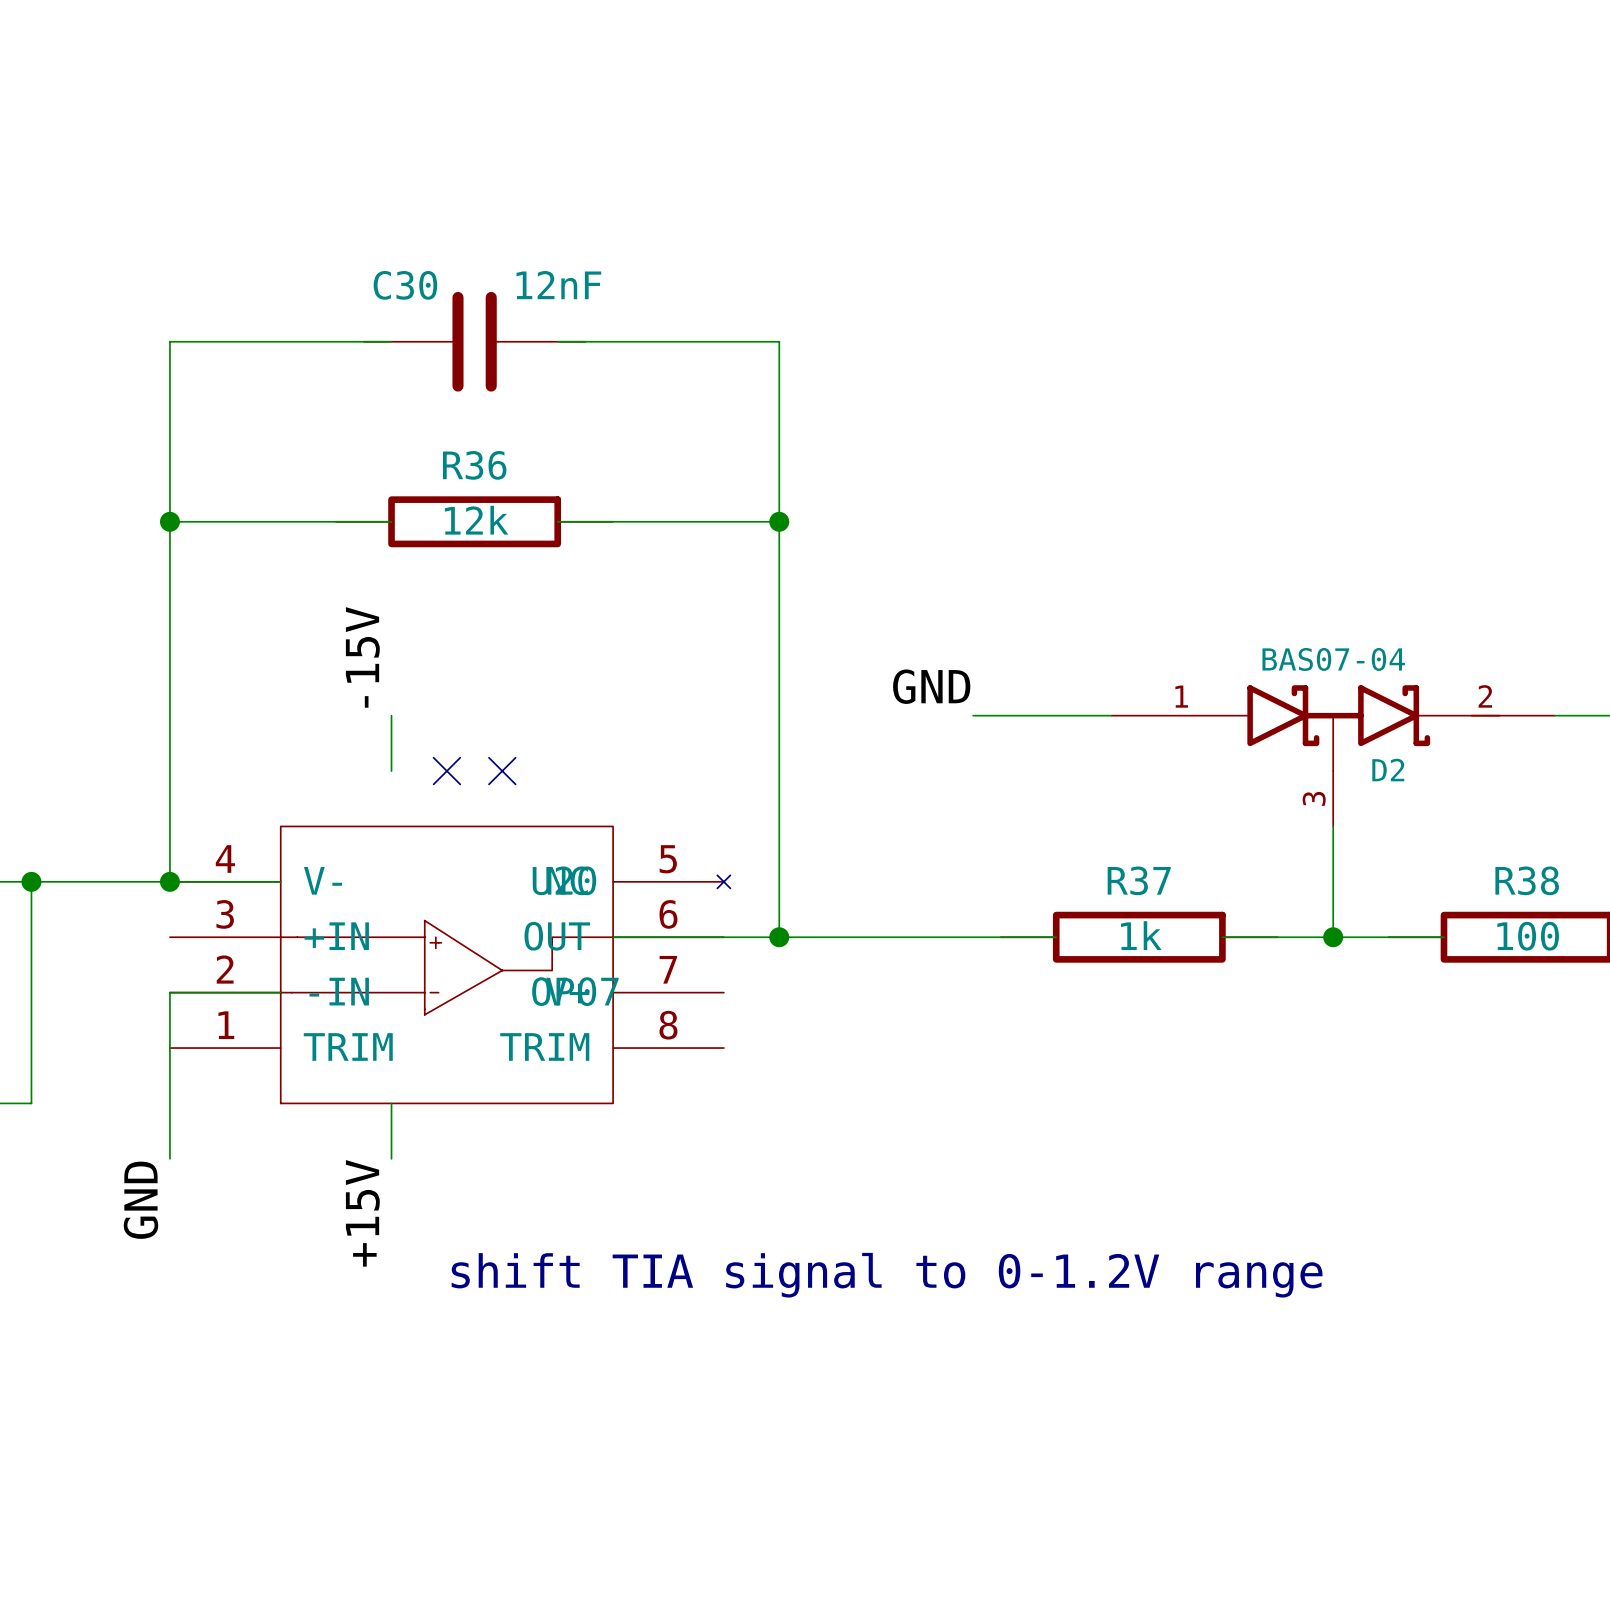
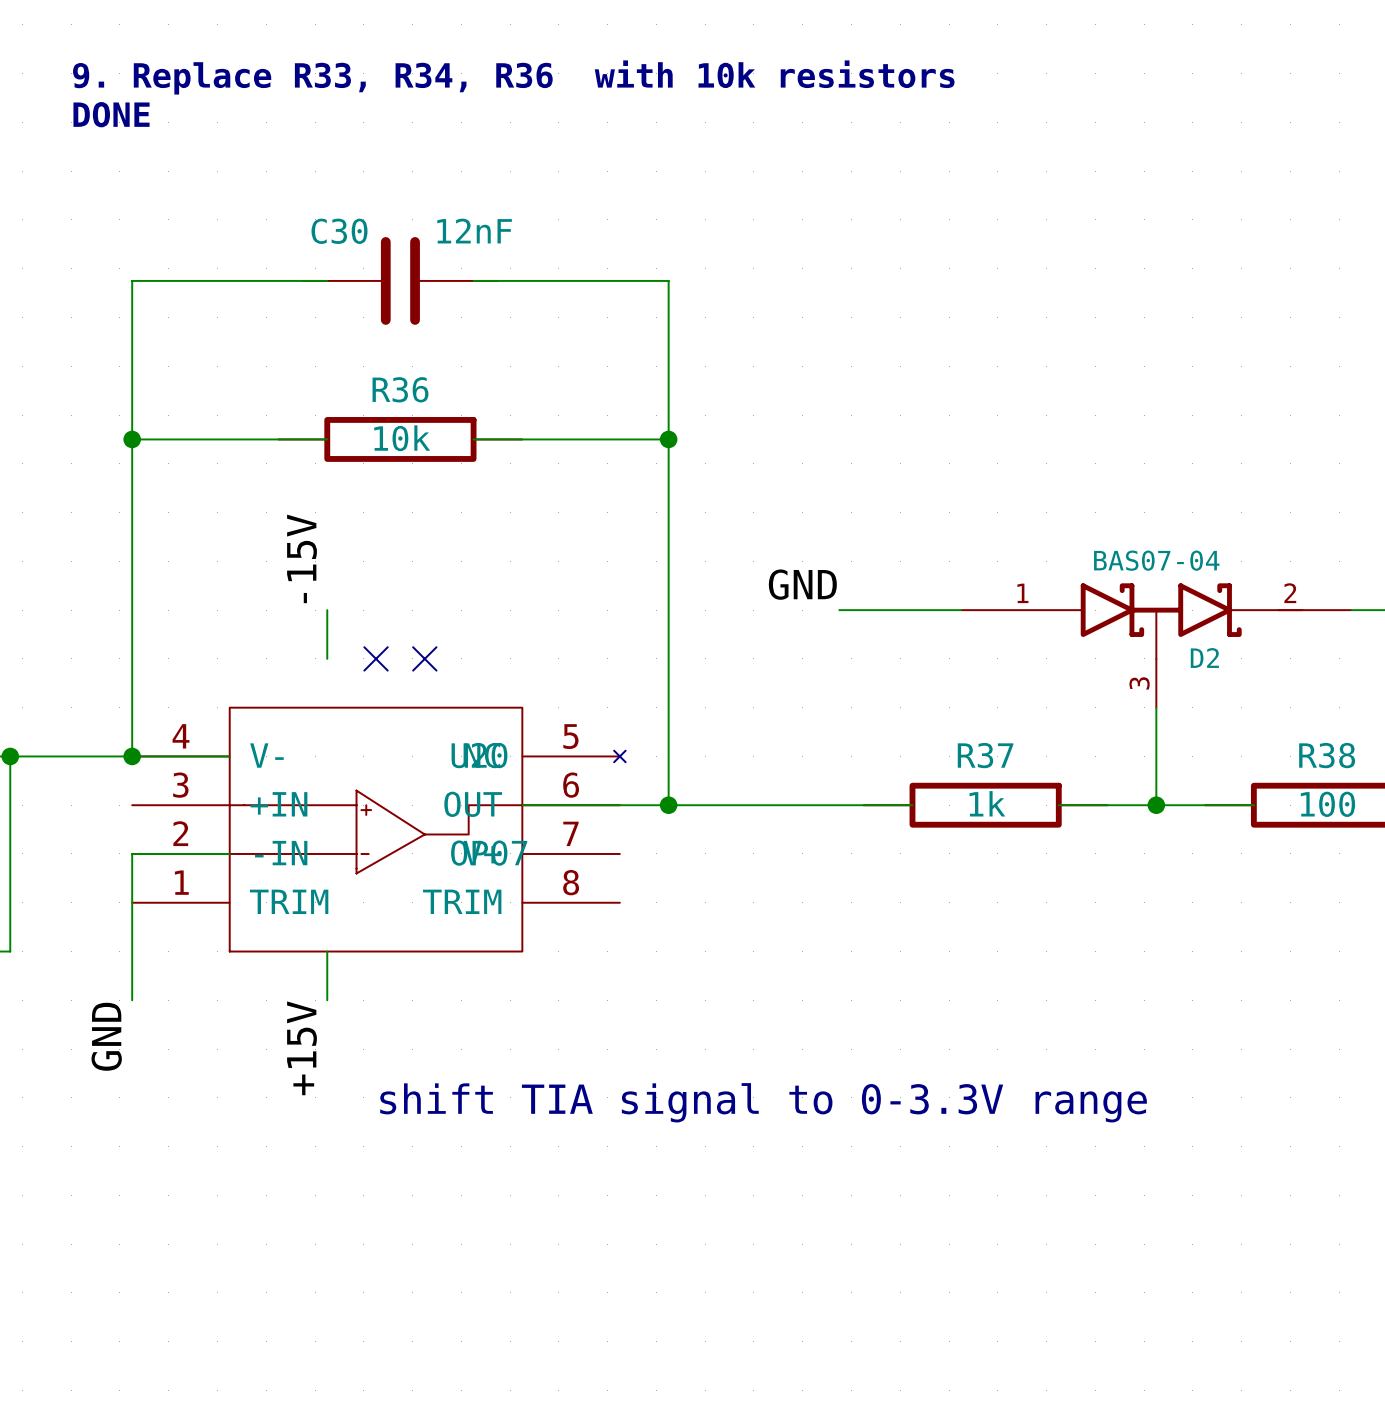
text: none -> 9. Replace R33, R34, R36 with 10k resistors (513, 77)
text: none -> DONE (111, 114)
R36 value: 12k (476, 520) -> 10k (402, 438)
text: shift TIA signal to 0-1.2V range (887, 1275) -> shift TIA signal to 0-3.3V range (763, 1102)

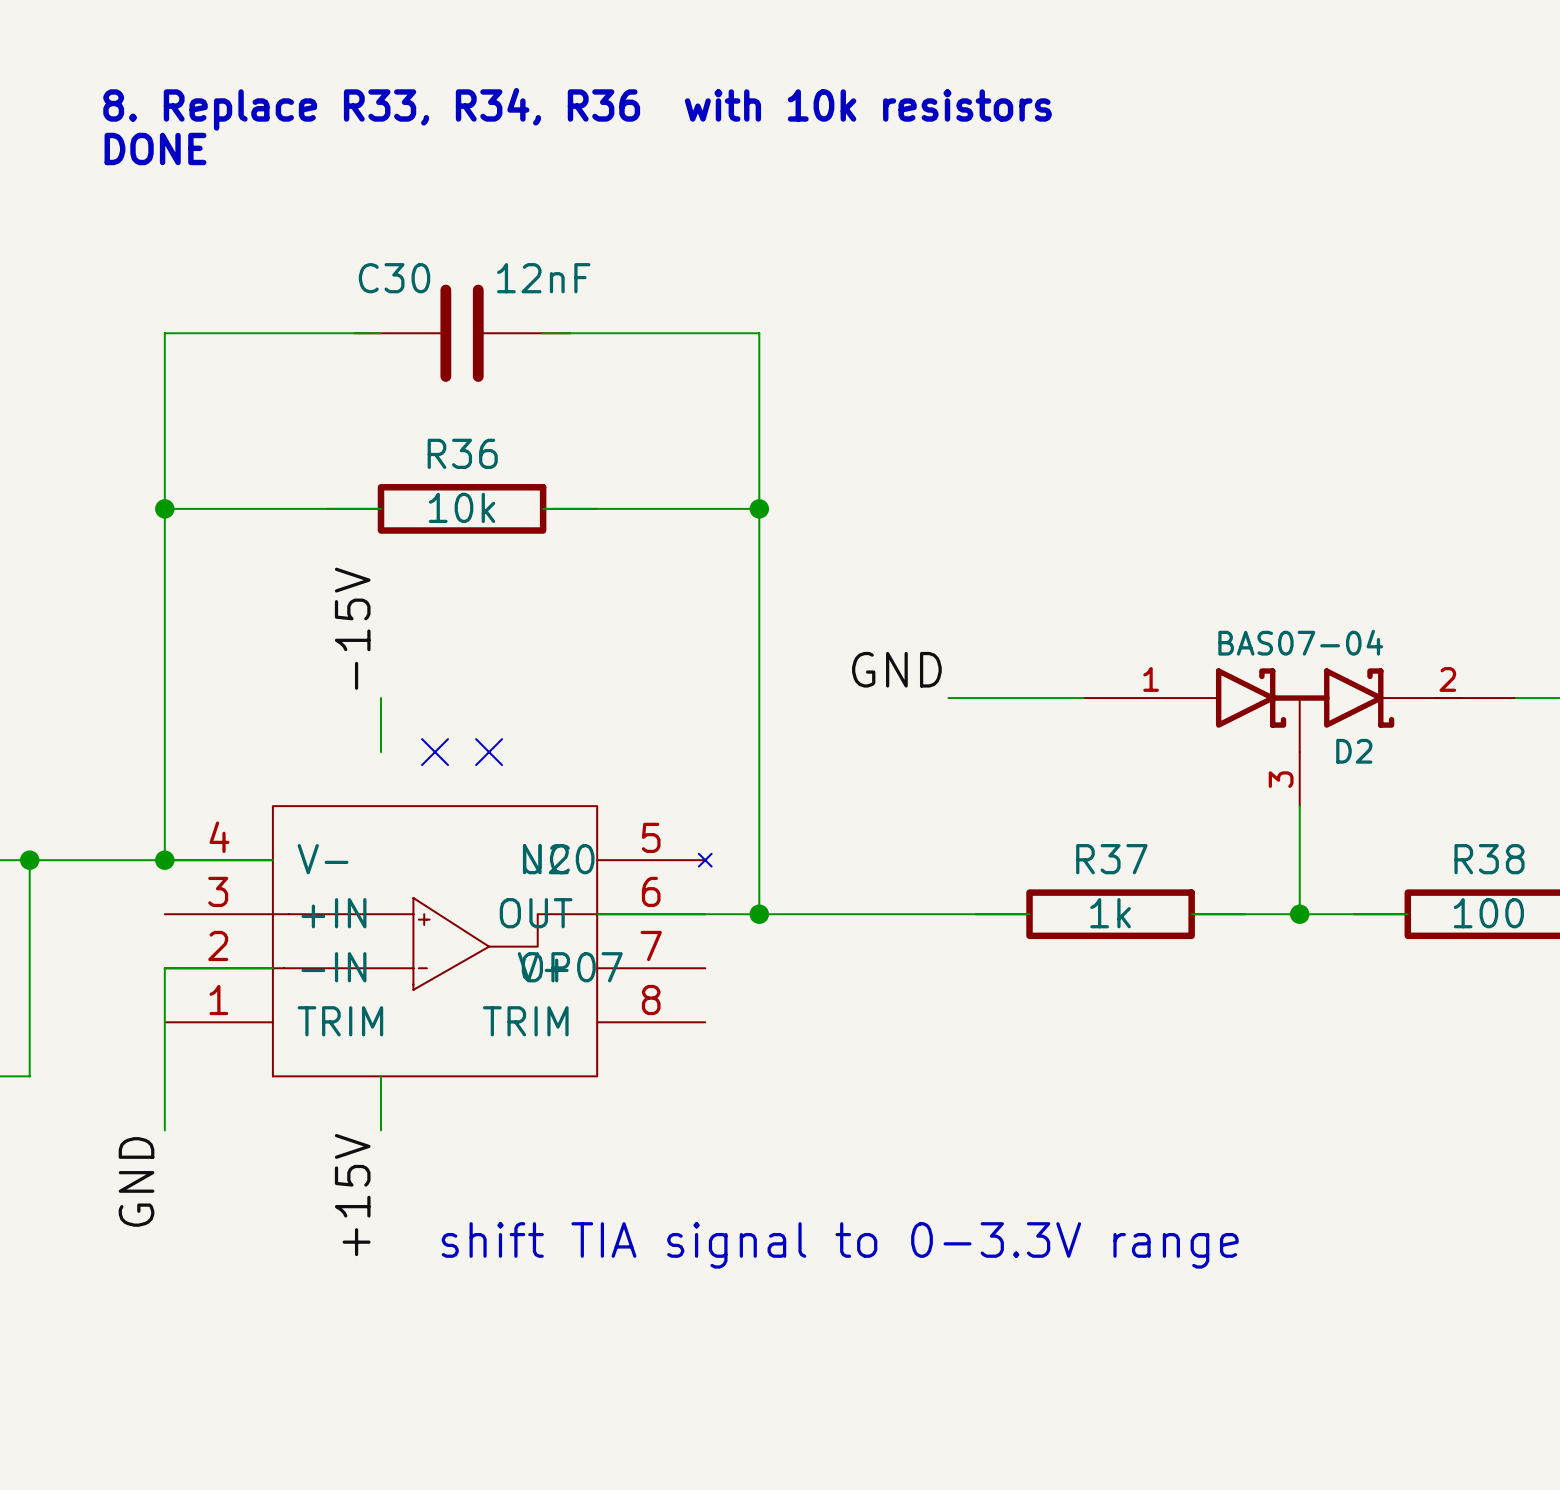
text: 9. Replace R33, R34, R36 with 10k resistors (513, 77) -> 8. Replace R33, R34, R36 with 10k resistors (577, 109)

